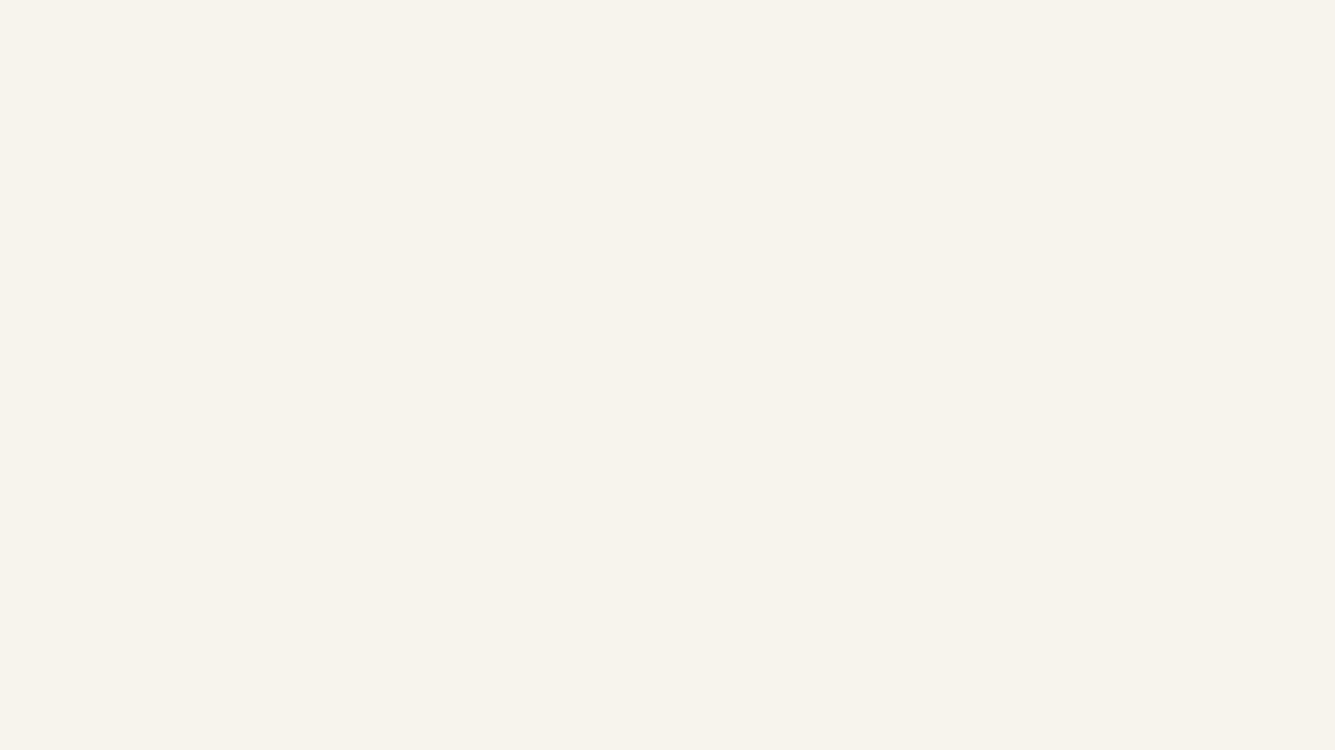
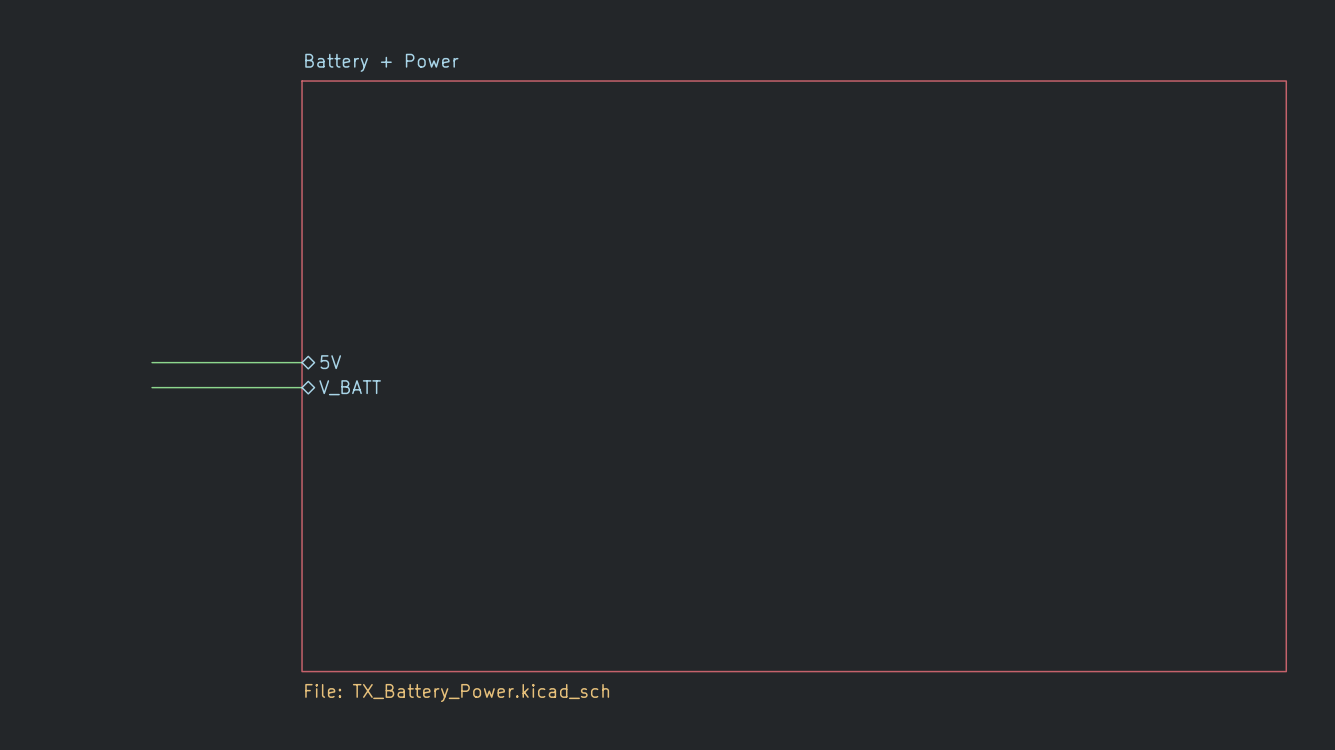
wire: none -> (152, 362) (302, 362)
sheet pin: none -> 5V (330, 362)
sheet Battery + Power: none -> File: TX_Battery_Power.kicad_sch (794, 376)
wire: none -> (152, 387) (302, 387)
sheet pin: none -> V_BATT (350, 387)

